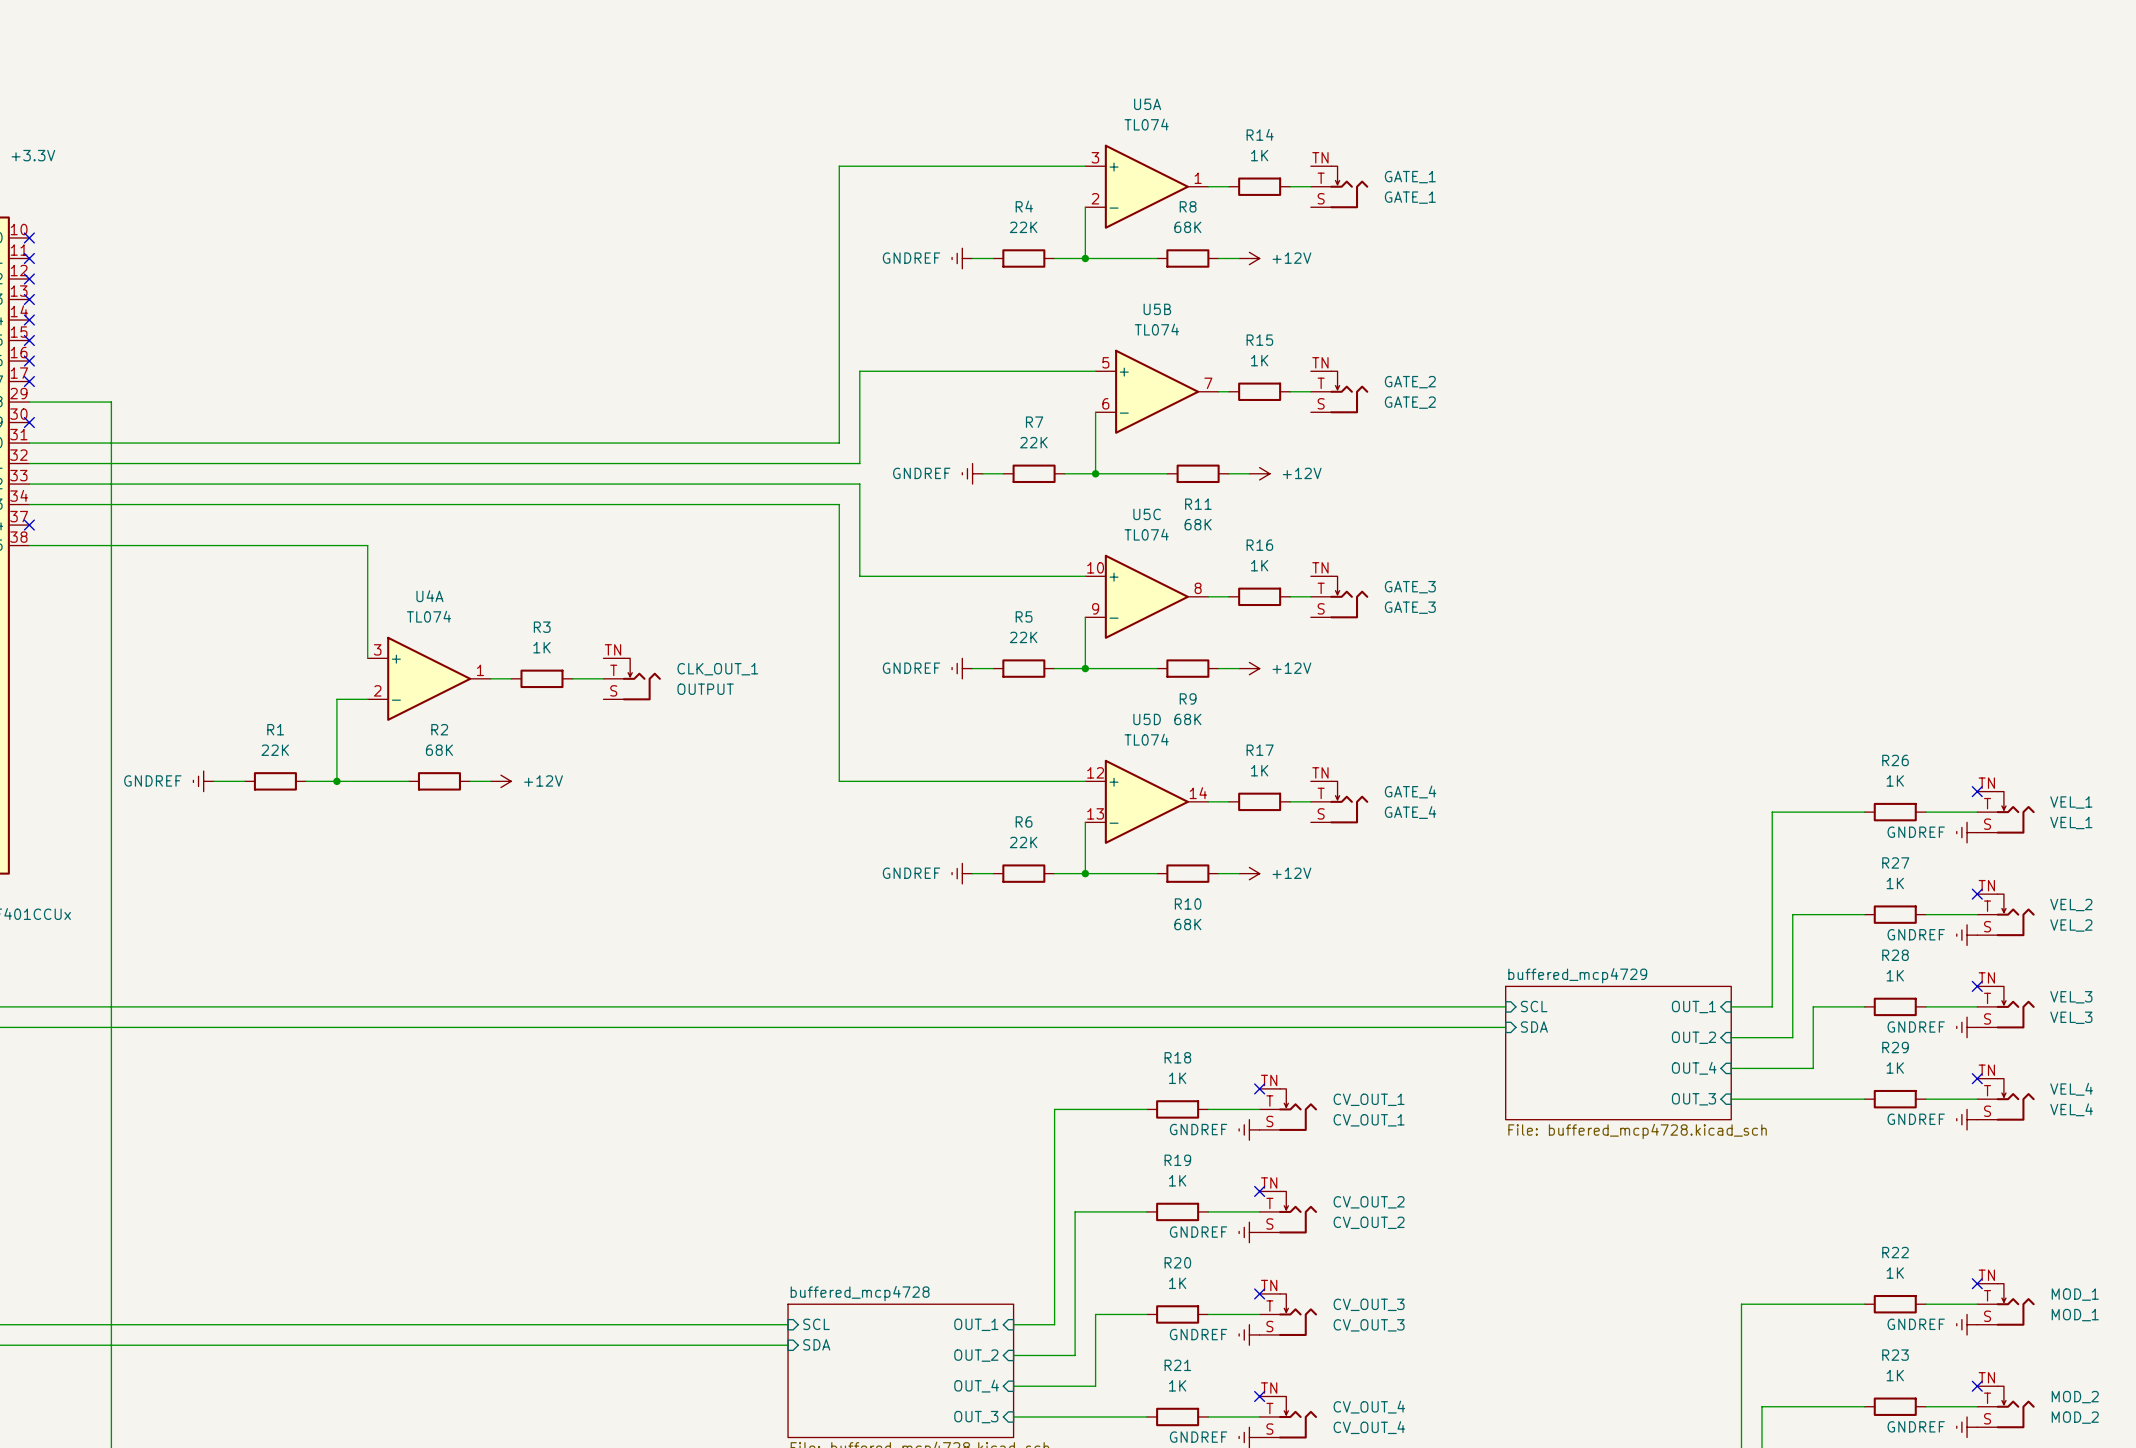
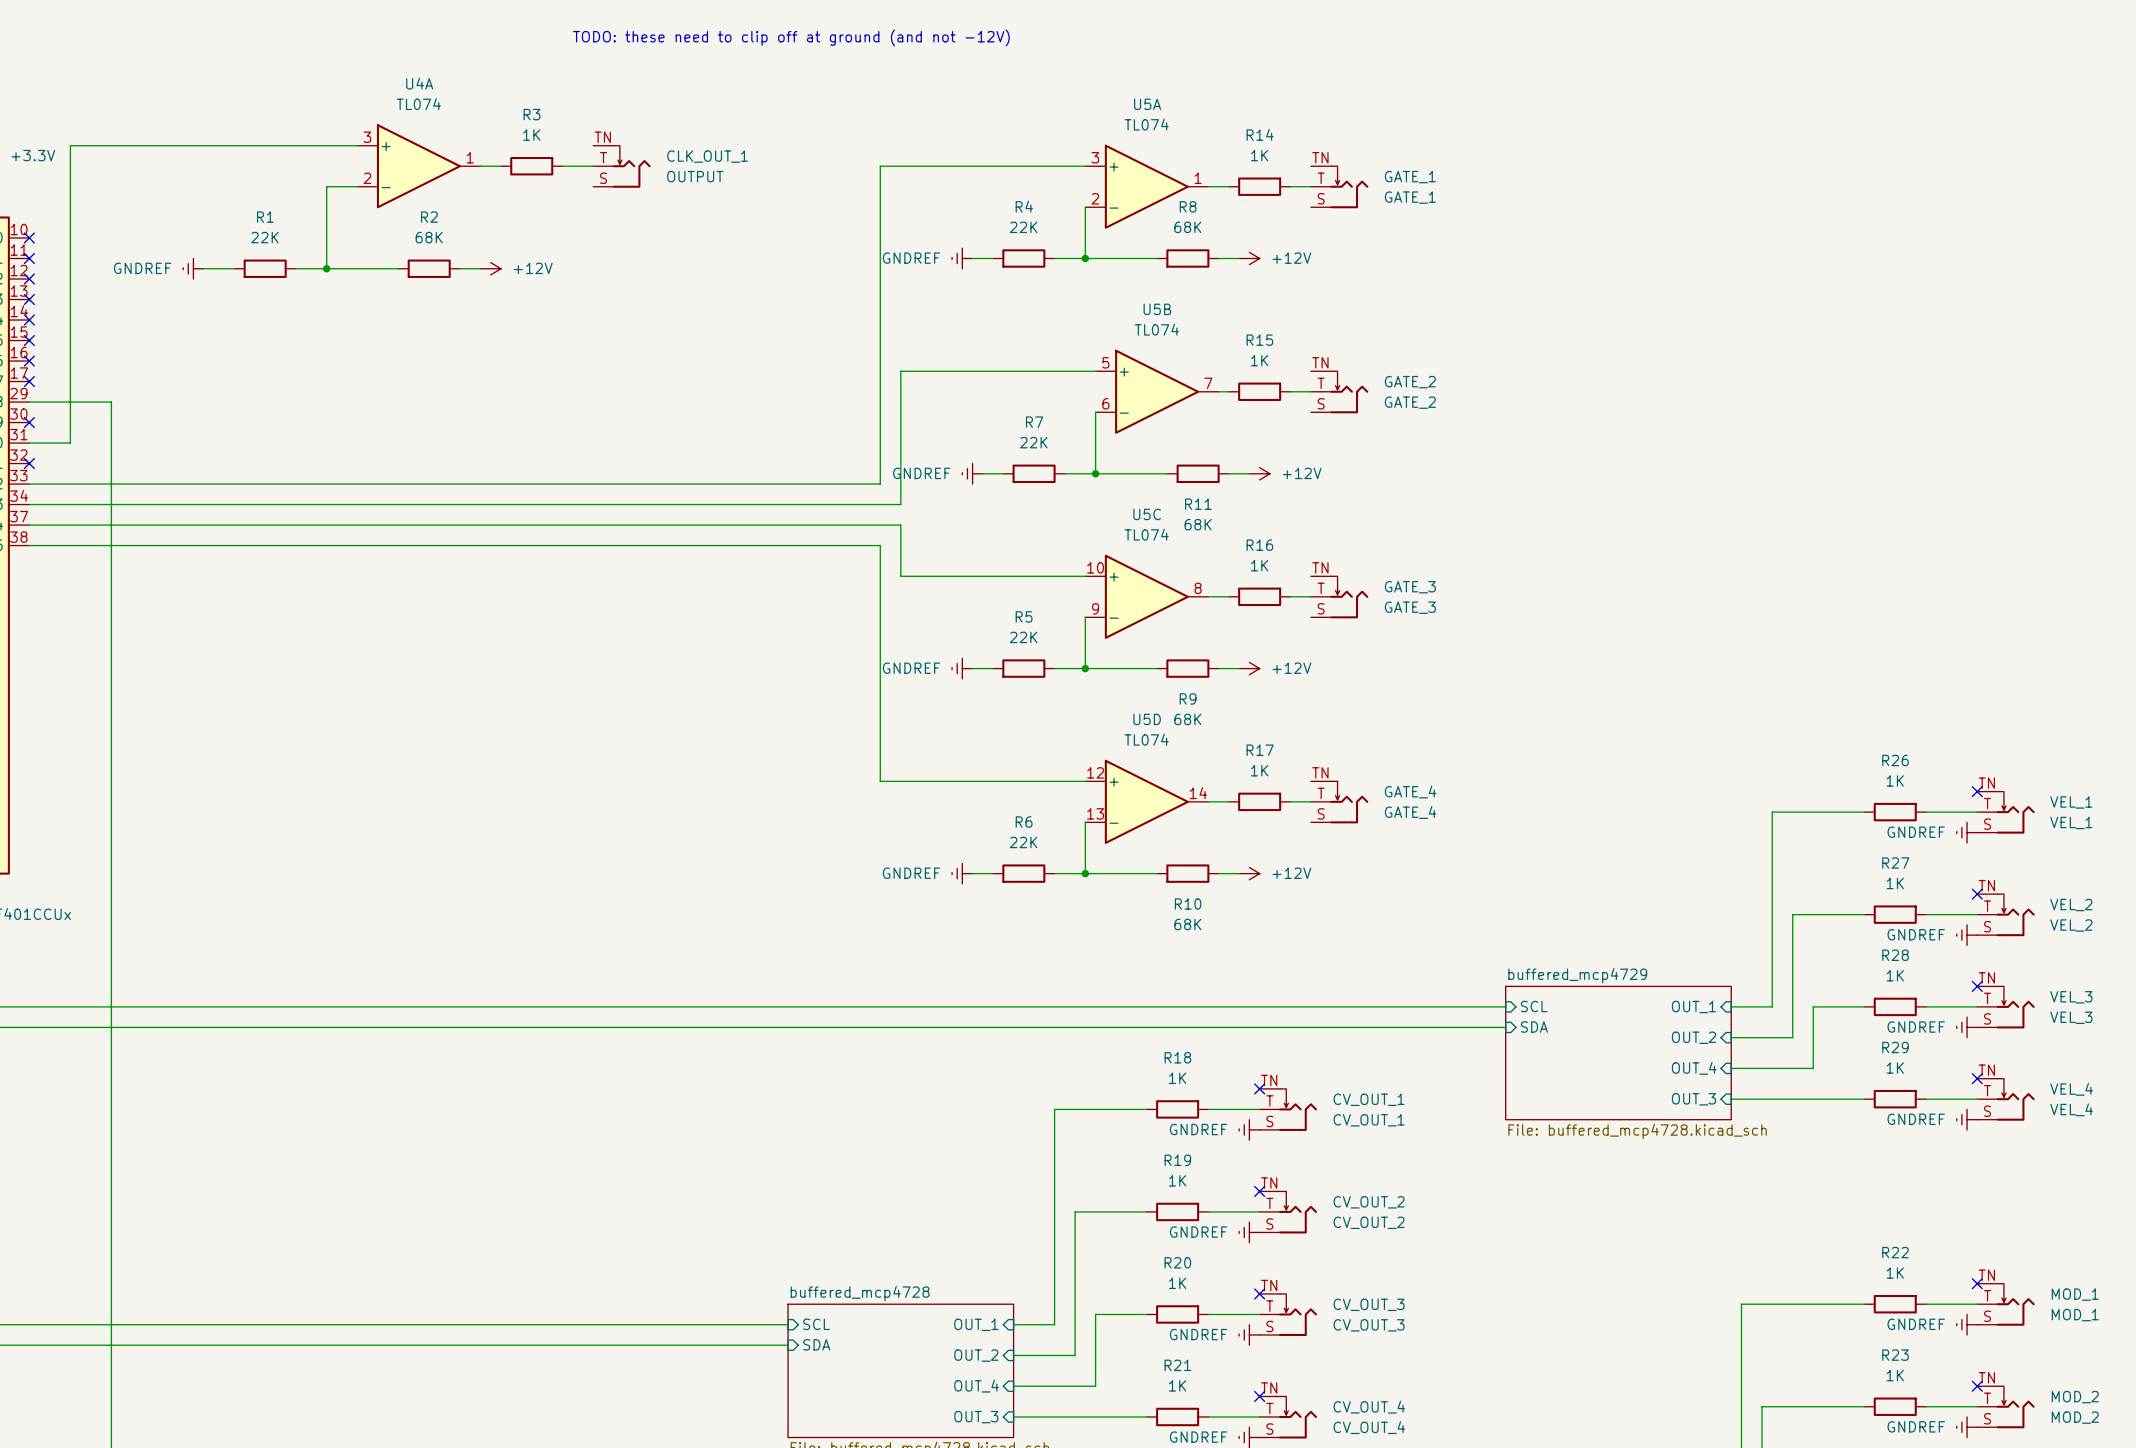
text: none -> TODO: these need to clip off at ground (and not -12V) (791, 37)
wire: none -> (480, 166) (500, 166)
wire: none -> (562, 166) (593, 166)
wire: (880, 166) (839, 166) (839, 443) (70, 443) -> (357, 145) (70, 145) (70, 443)
wire: none -> (357, 186) (326, 186) (326, 268)
power symbol: none -> GNDREF (193, 268)
wire: none -> (203, 268) (234, 268)
wire: none -> (295, 268) (398, 268)
junction: none -> (326, 268)
wire: none -> (459, 268) (480, 268)
power symbol: none -> +12V (490, 268)
wire: (900, 371) (859, 371) (859, 463) (29, 463) -> none
no-connect mark: none -> (29, 463)
wire: (859, 484) (859, 576) (900, 576) -> (859, 484) (880, 484) (880, 166)
wire: (839, 504) (839, 781) (880, 781) -> (839, 504) (900, 504) (900, 371)
wire: none -> (29, 525) (900, 525) (900, 576)
no-connect mark: (29, 525) -> none
wire: (367, 545) (367, 658) -> (367, 545) (880, 545) (880, 781)
U4A position: (429, 678) -> (418, 166)
wire: (490, 678) (511, 678) -> none
R3 position: (541, 678) -> (531, 166)
wire: (572, 678) (603, 678) -> none
CLK_OUT_1 position: (632, 679) -> (621, 166)
wire: (367, 699) (336, 699) (336, 781) -> none
power symbol: GNDREF (203, 781) -> none
wire: (213, 781) (244, 781) -> none
R1 position: (275, 781) -> (265, 268)
wire: (306, 781) (408, 781) -> none
junction: (336, 781) -> none
R2 position: (439, 781) -> (429, 268)
wire: (470, 781) (490, 781) -> none
power symbol: +12V (500, 781) -> none

